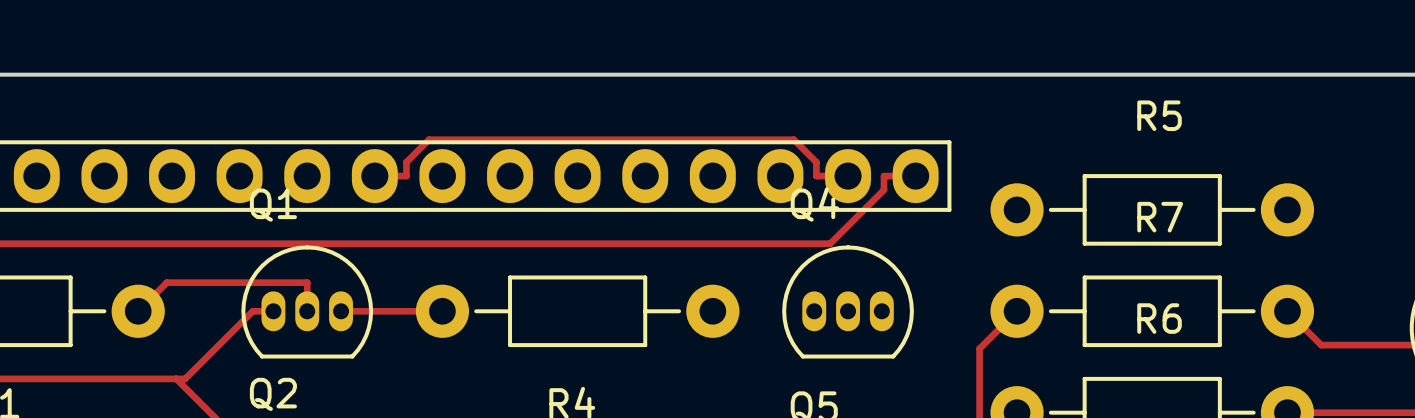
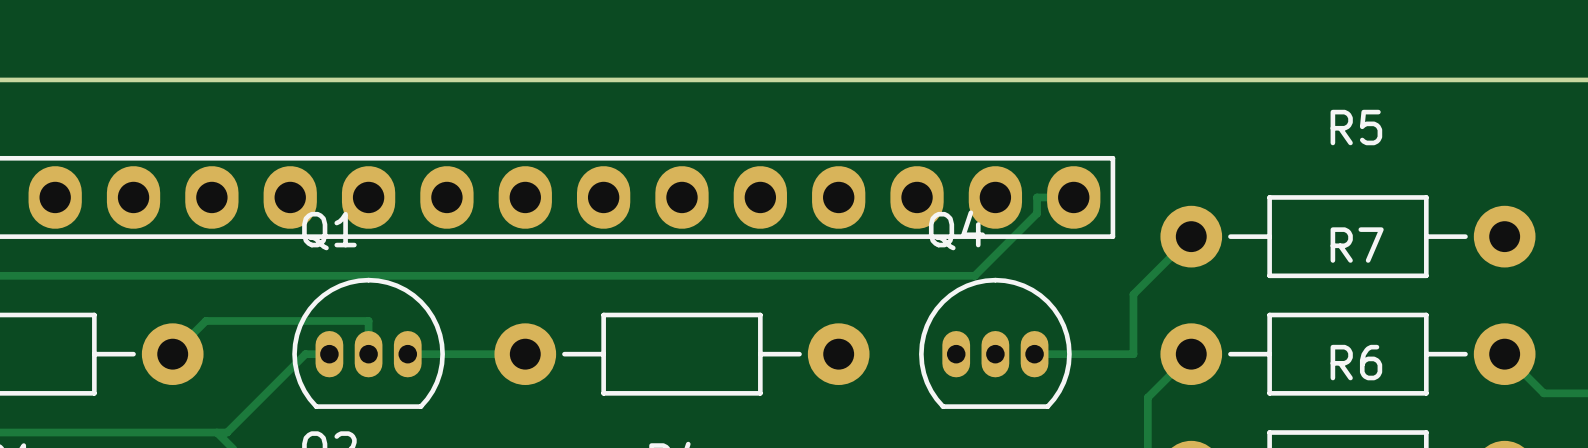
track: (374, 176) (406, 176) (406, 162) (428, 139) (793, 139) (816, 162) (816, 176) (848, 176) -> none
track: none -> (1191, 236) (1133, 294) (1133, 354) (1034, 354)

